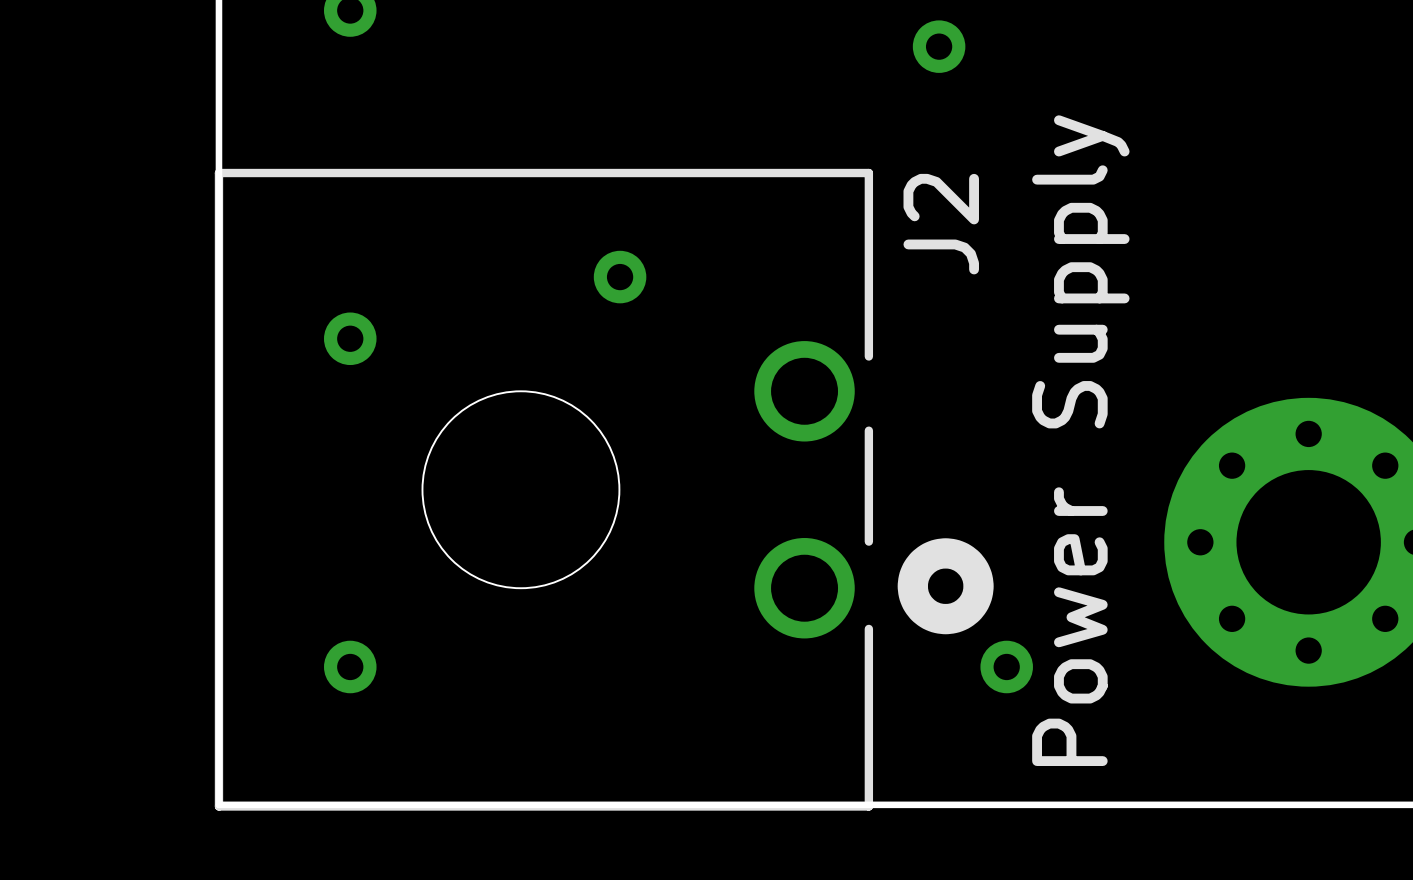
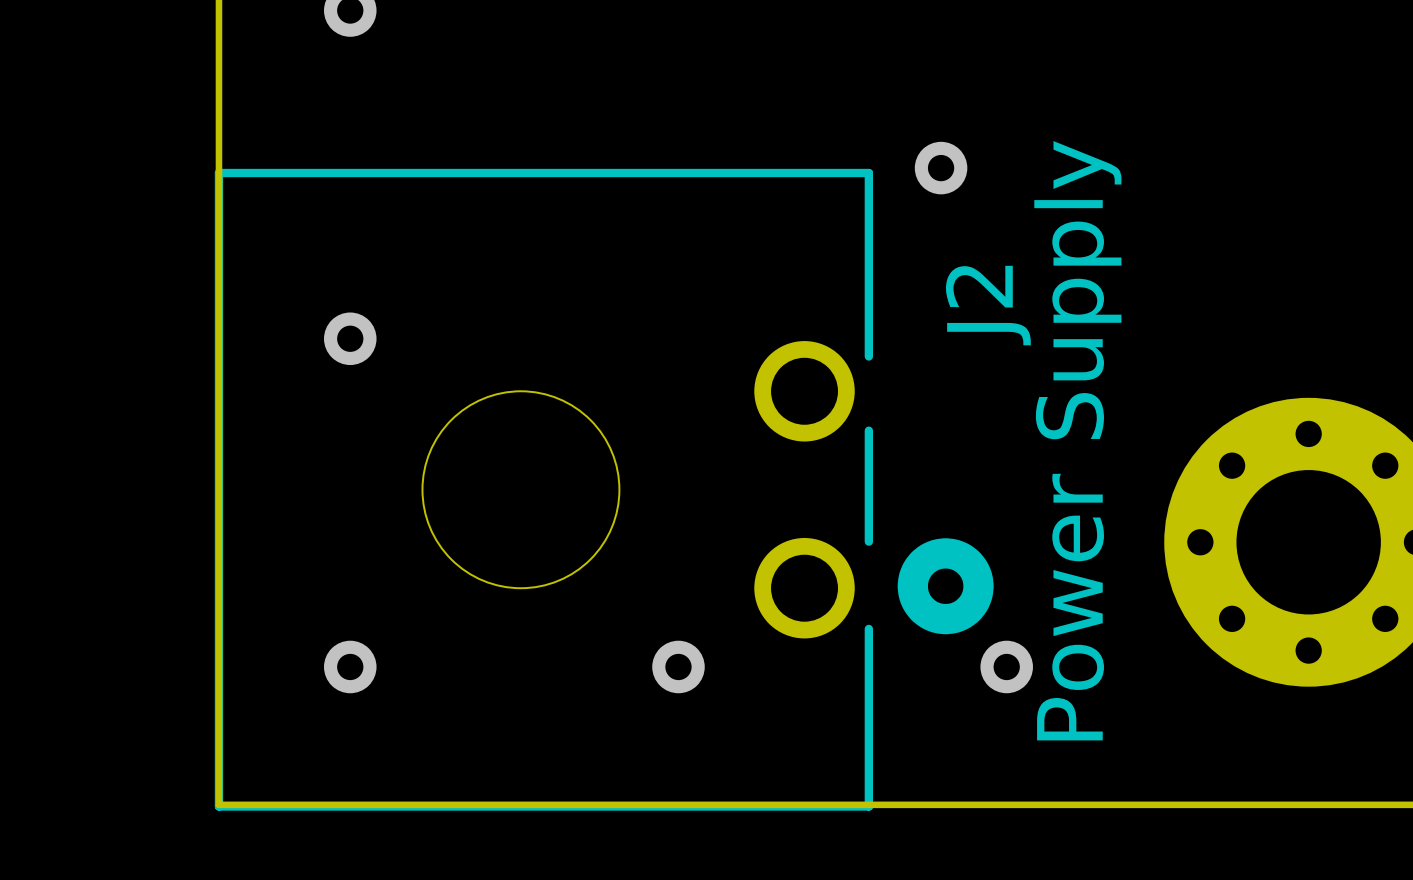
via position: (939, 46) -> (941, 168)
J2 name position: J2 (941, 224) -> J2 (988, 305)
via: (620, 277) -> none
via: none -> (678, 666)

